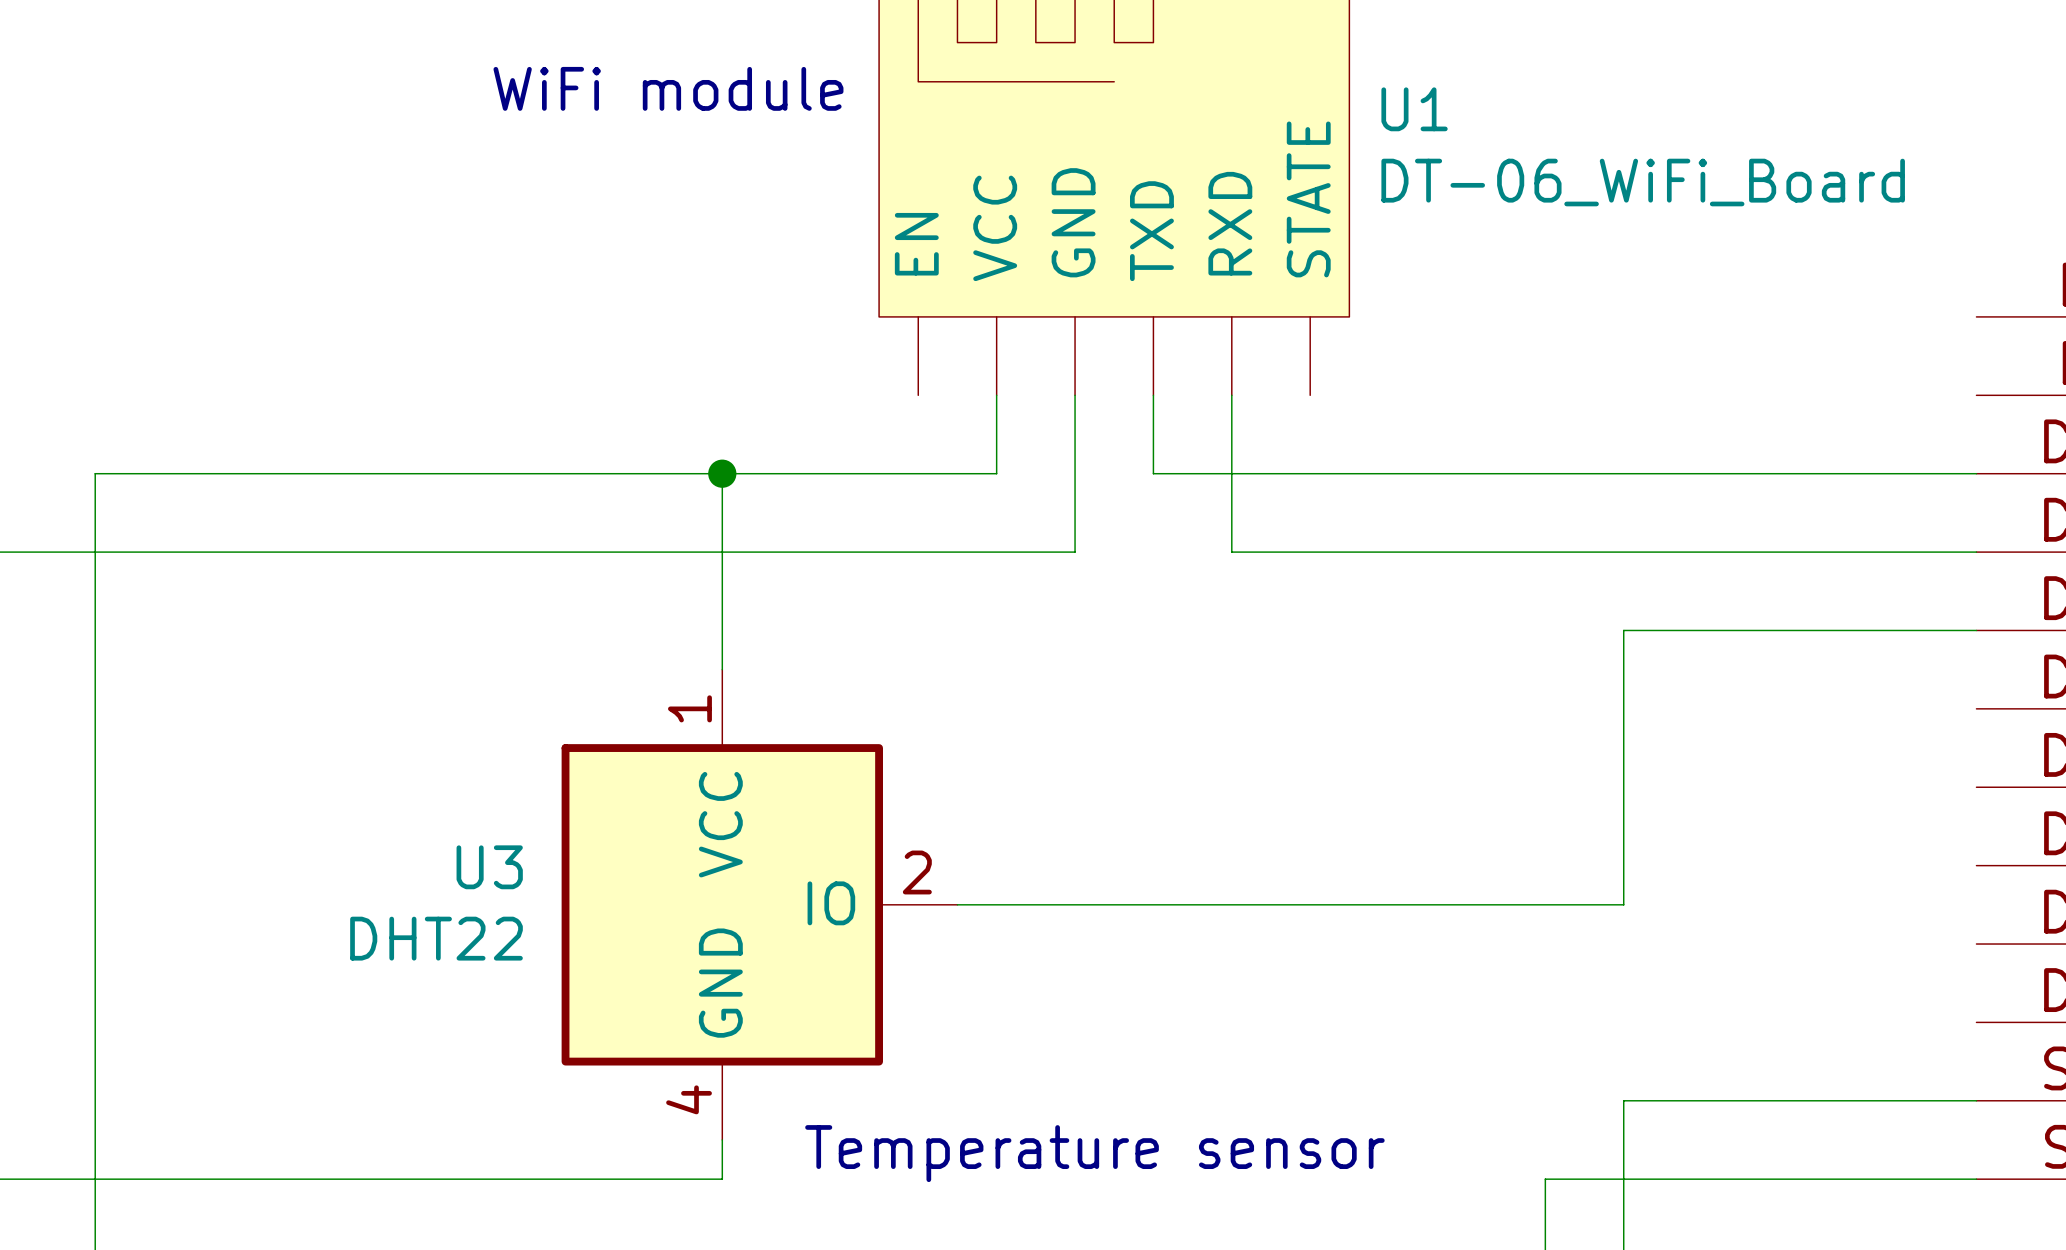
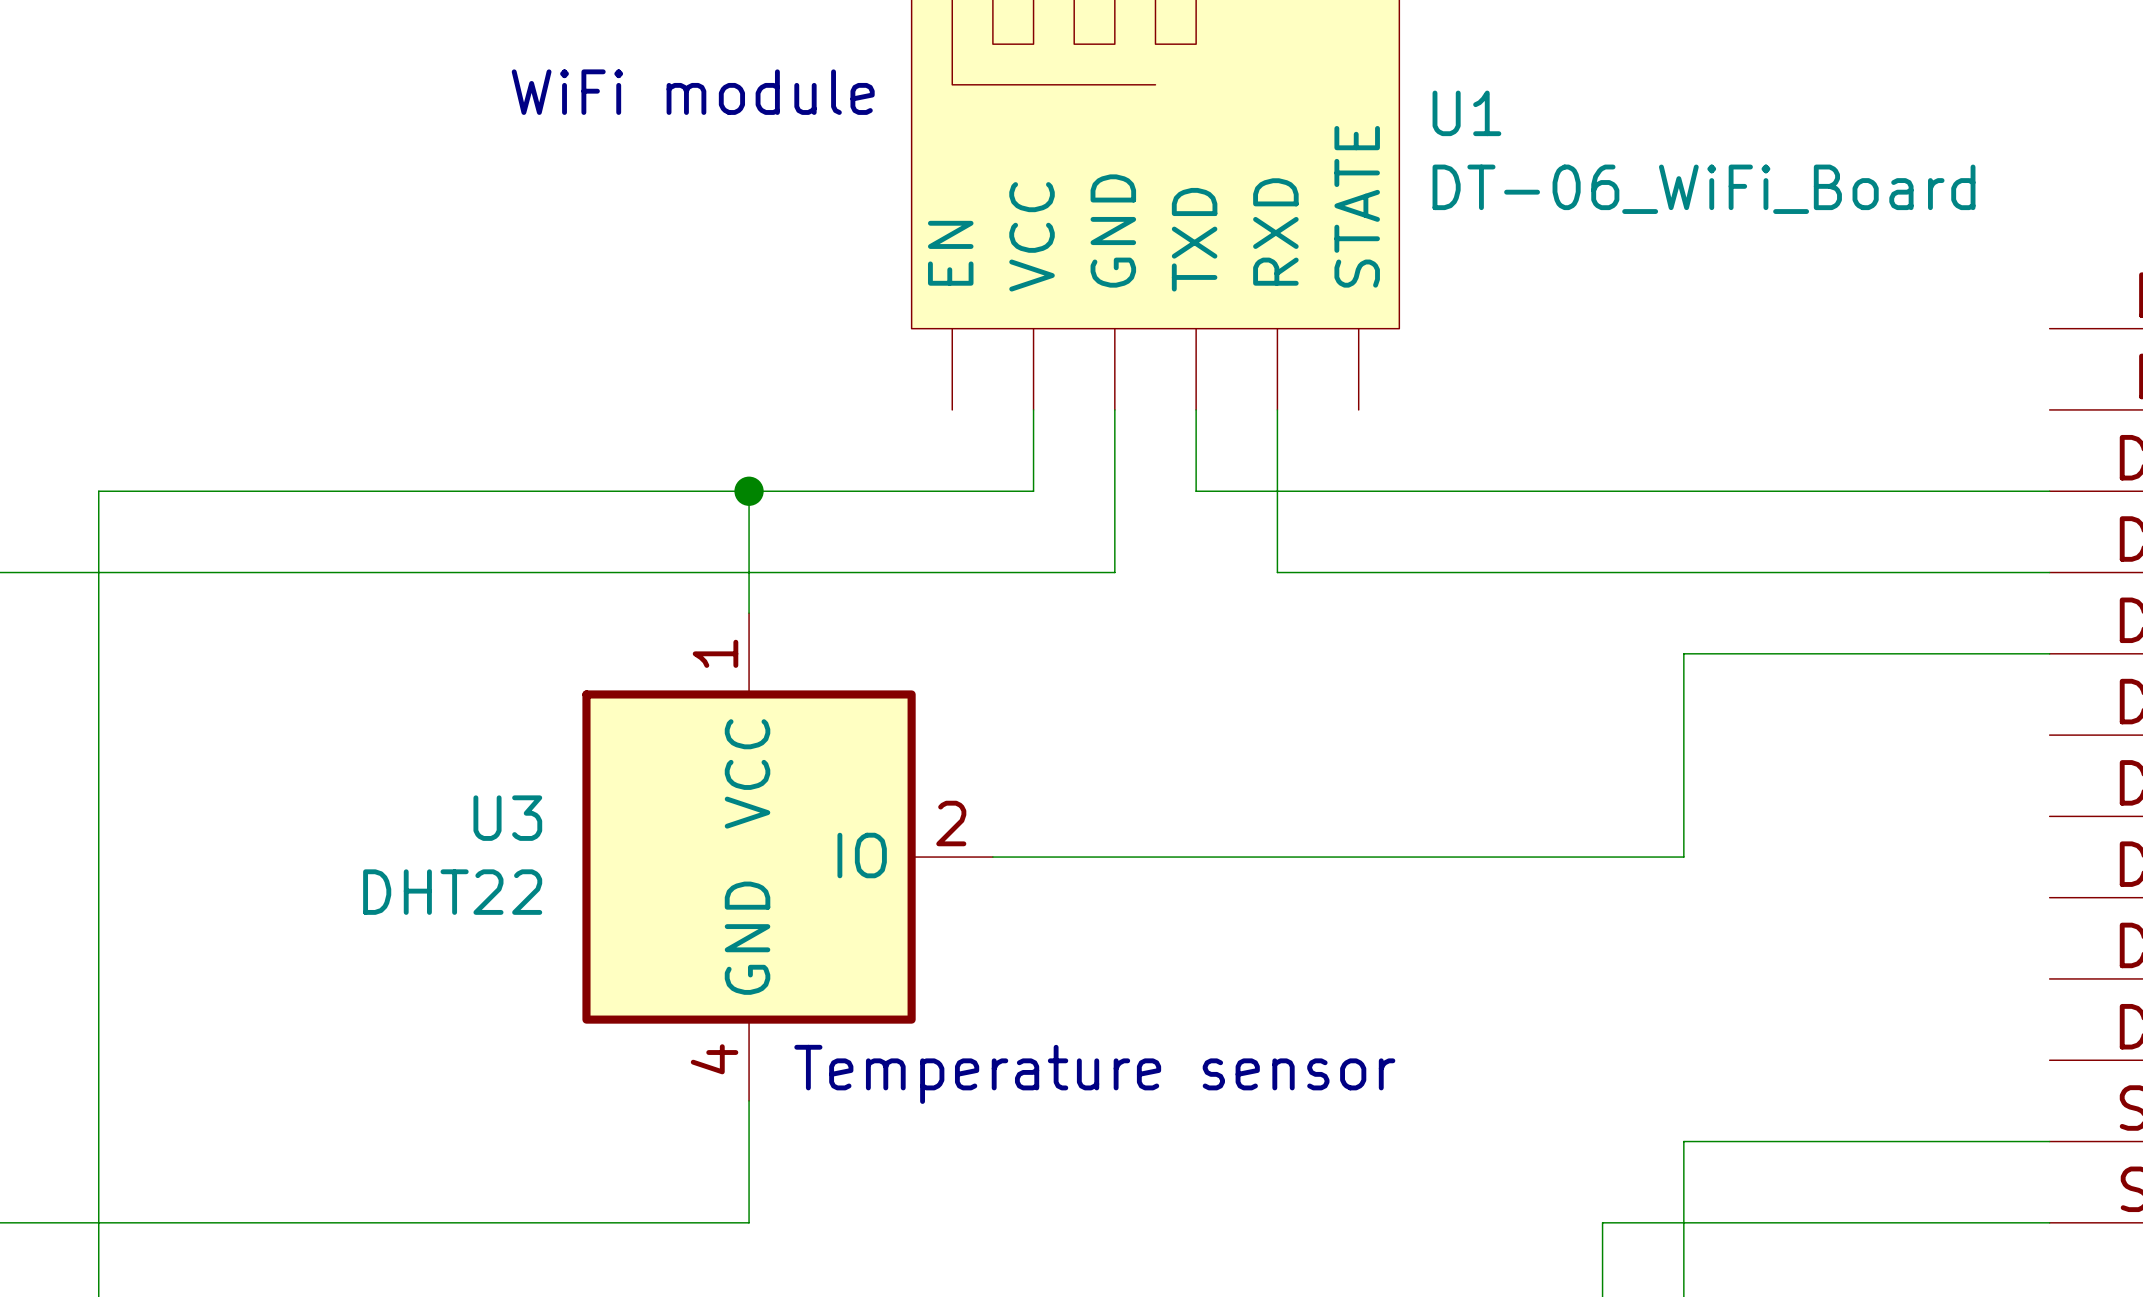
wire: (1623, 826) (1623, 904) (957, 904) -> (1683, 857) (992, 857)
U3 position: (759, 904) -> (787, 857)
text position: Temperature sensor (1094, 1153) -> Temperature sensor (1094, 1074)

